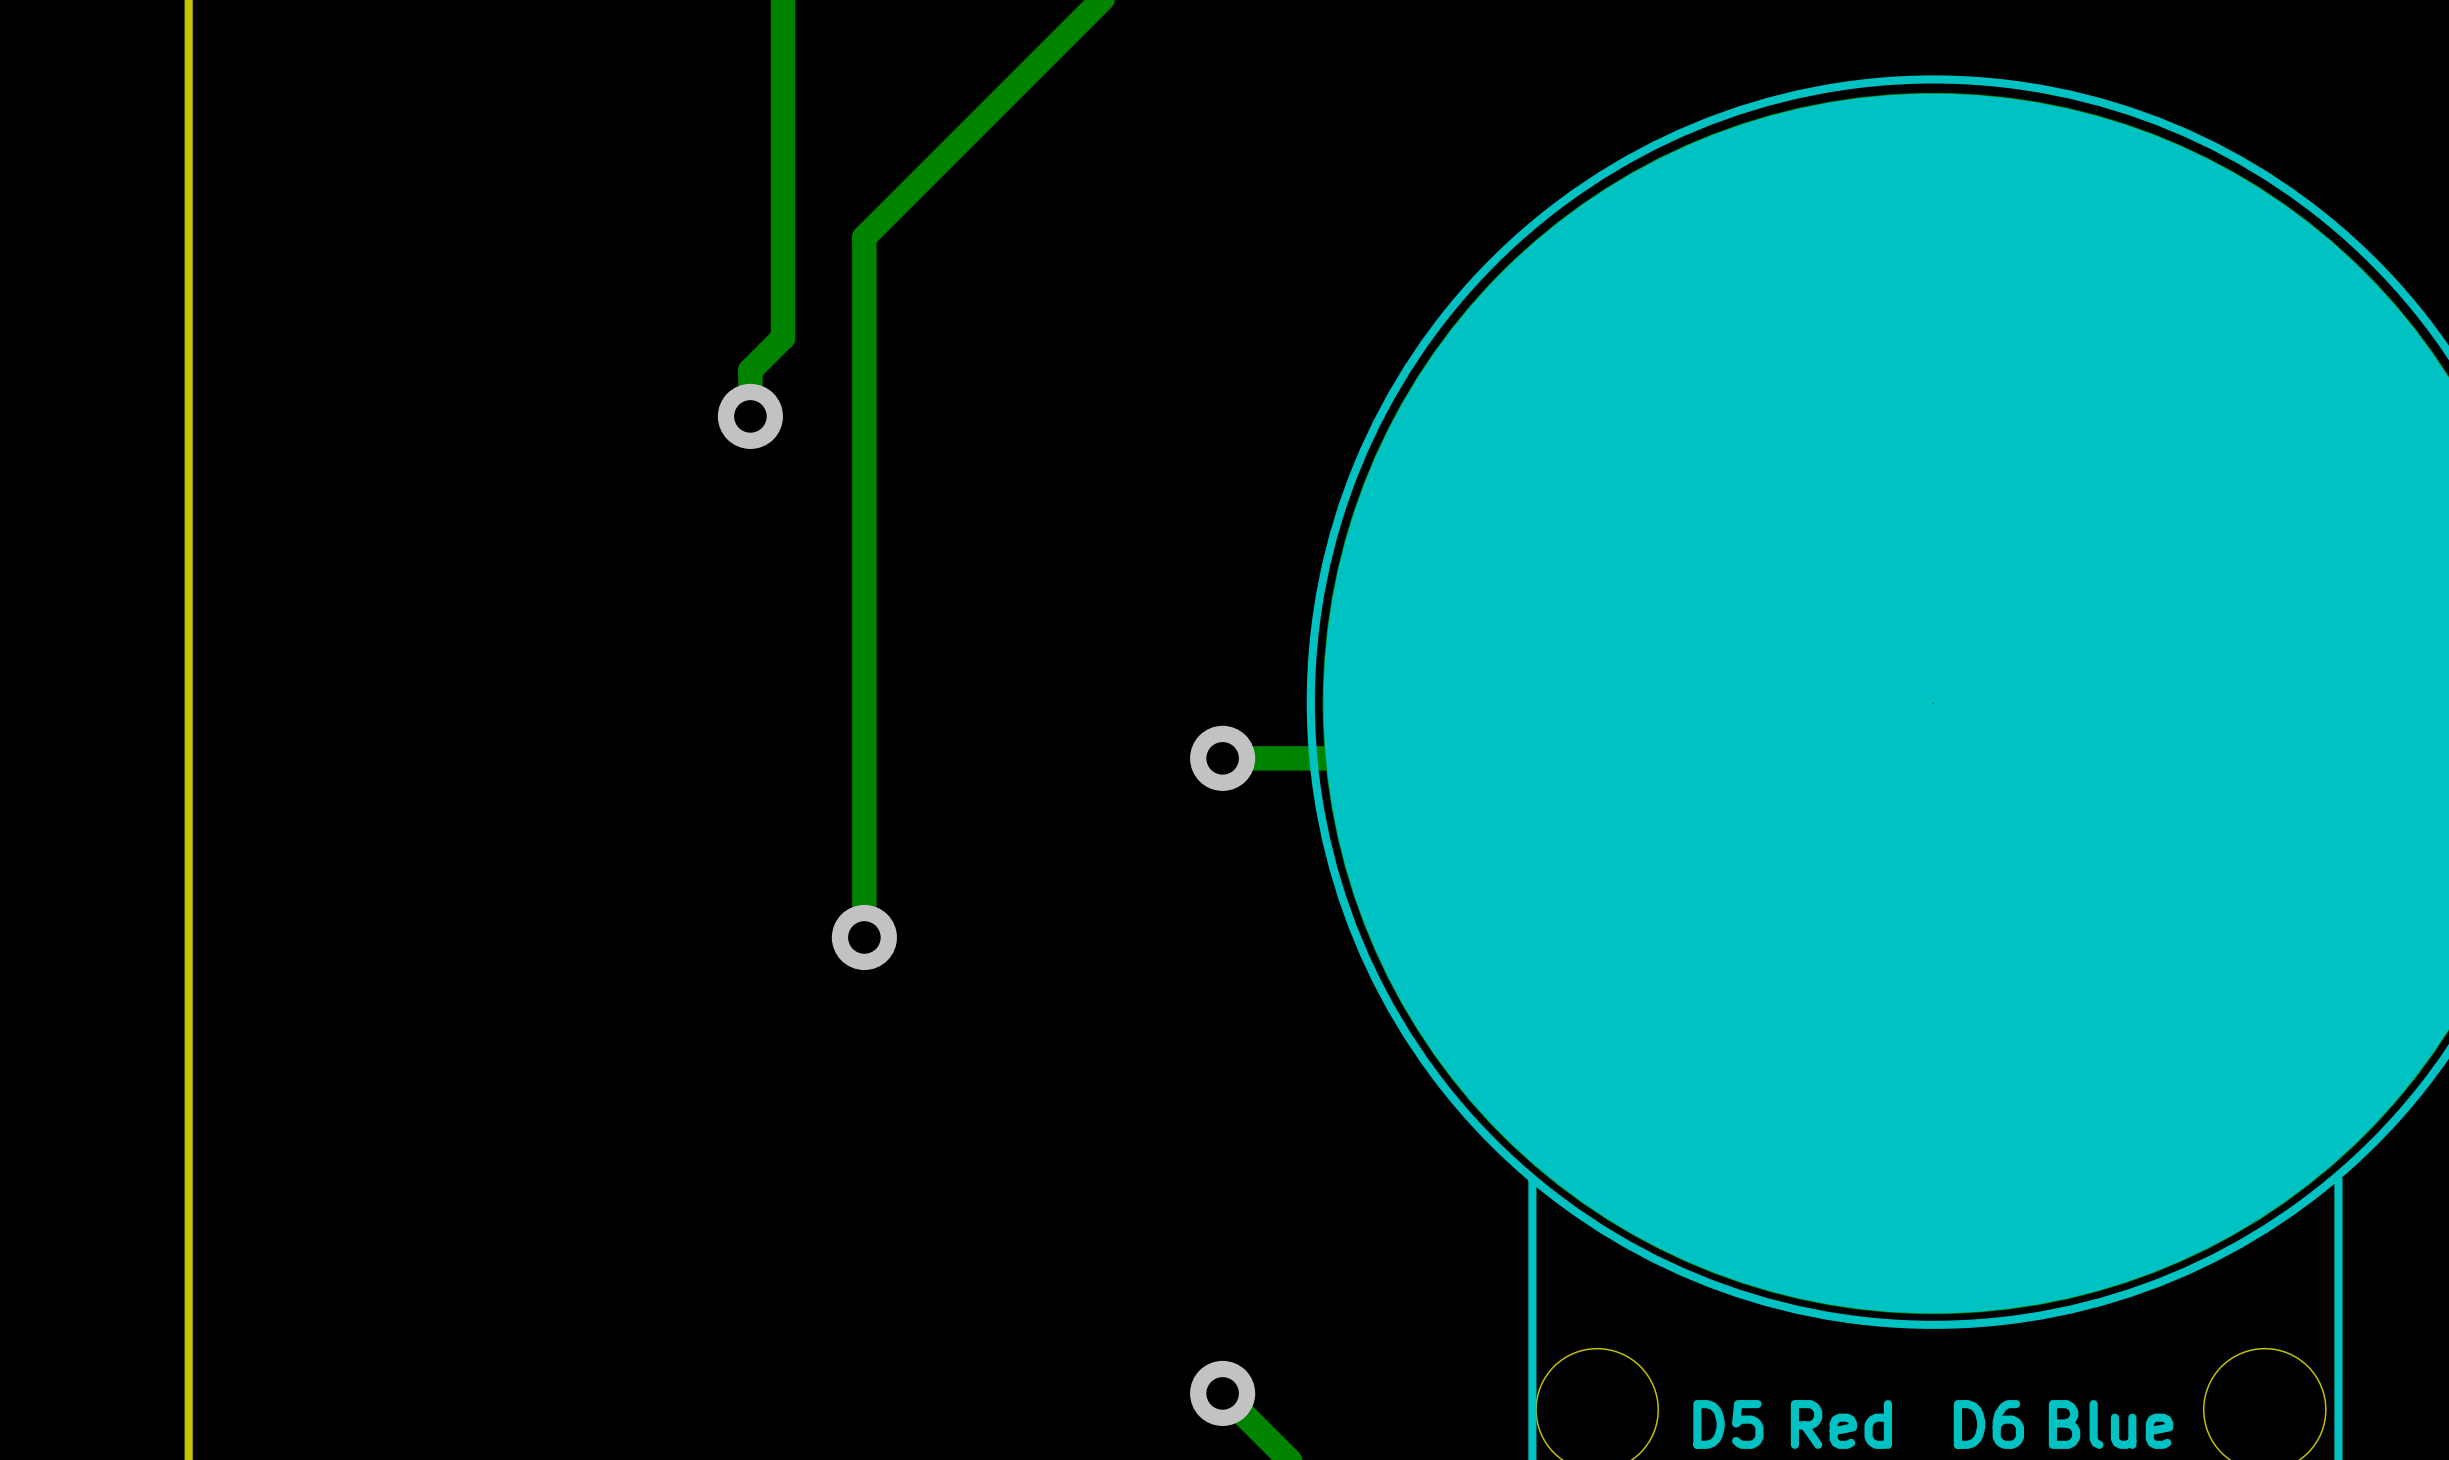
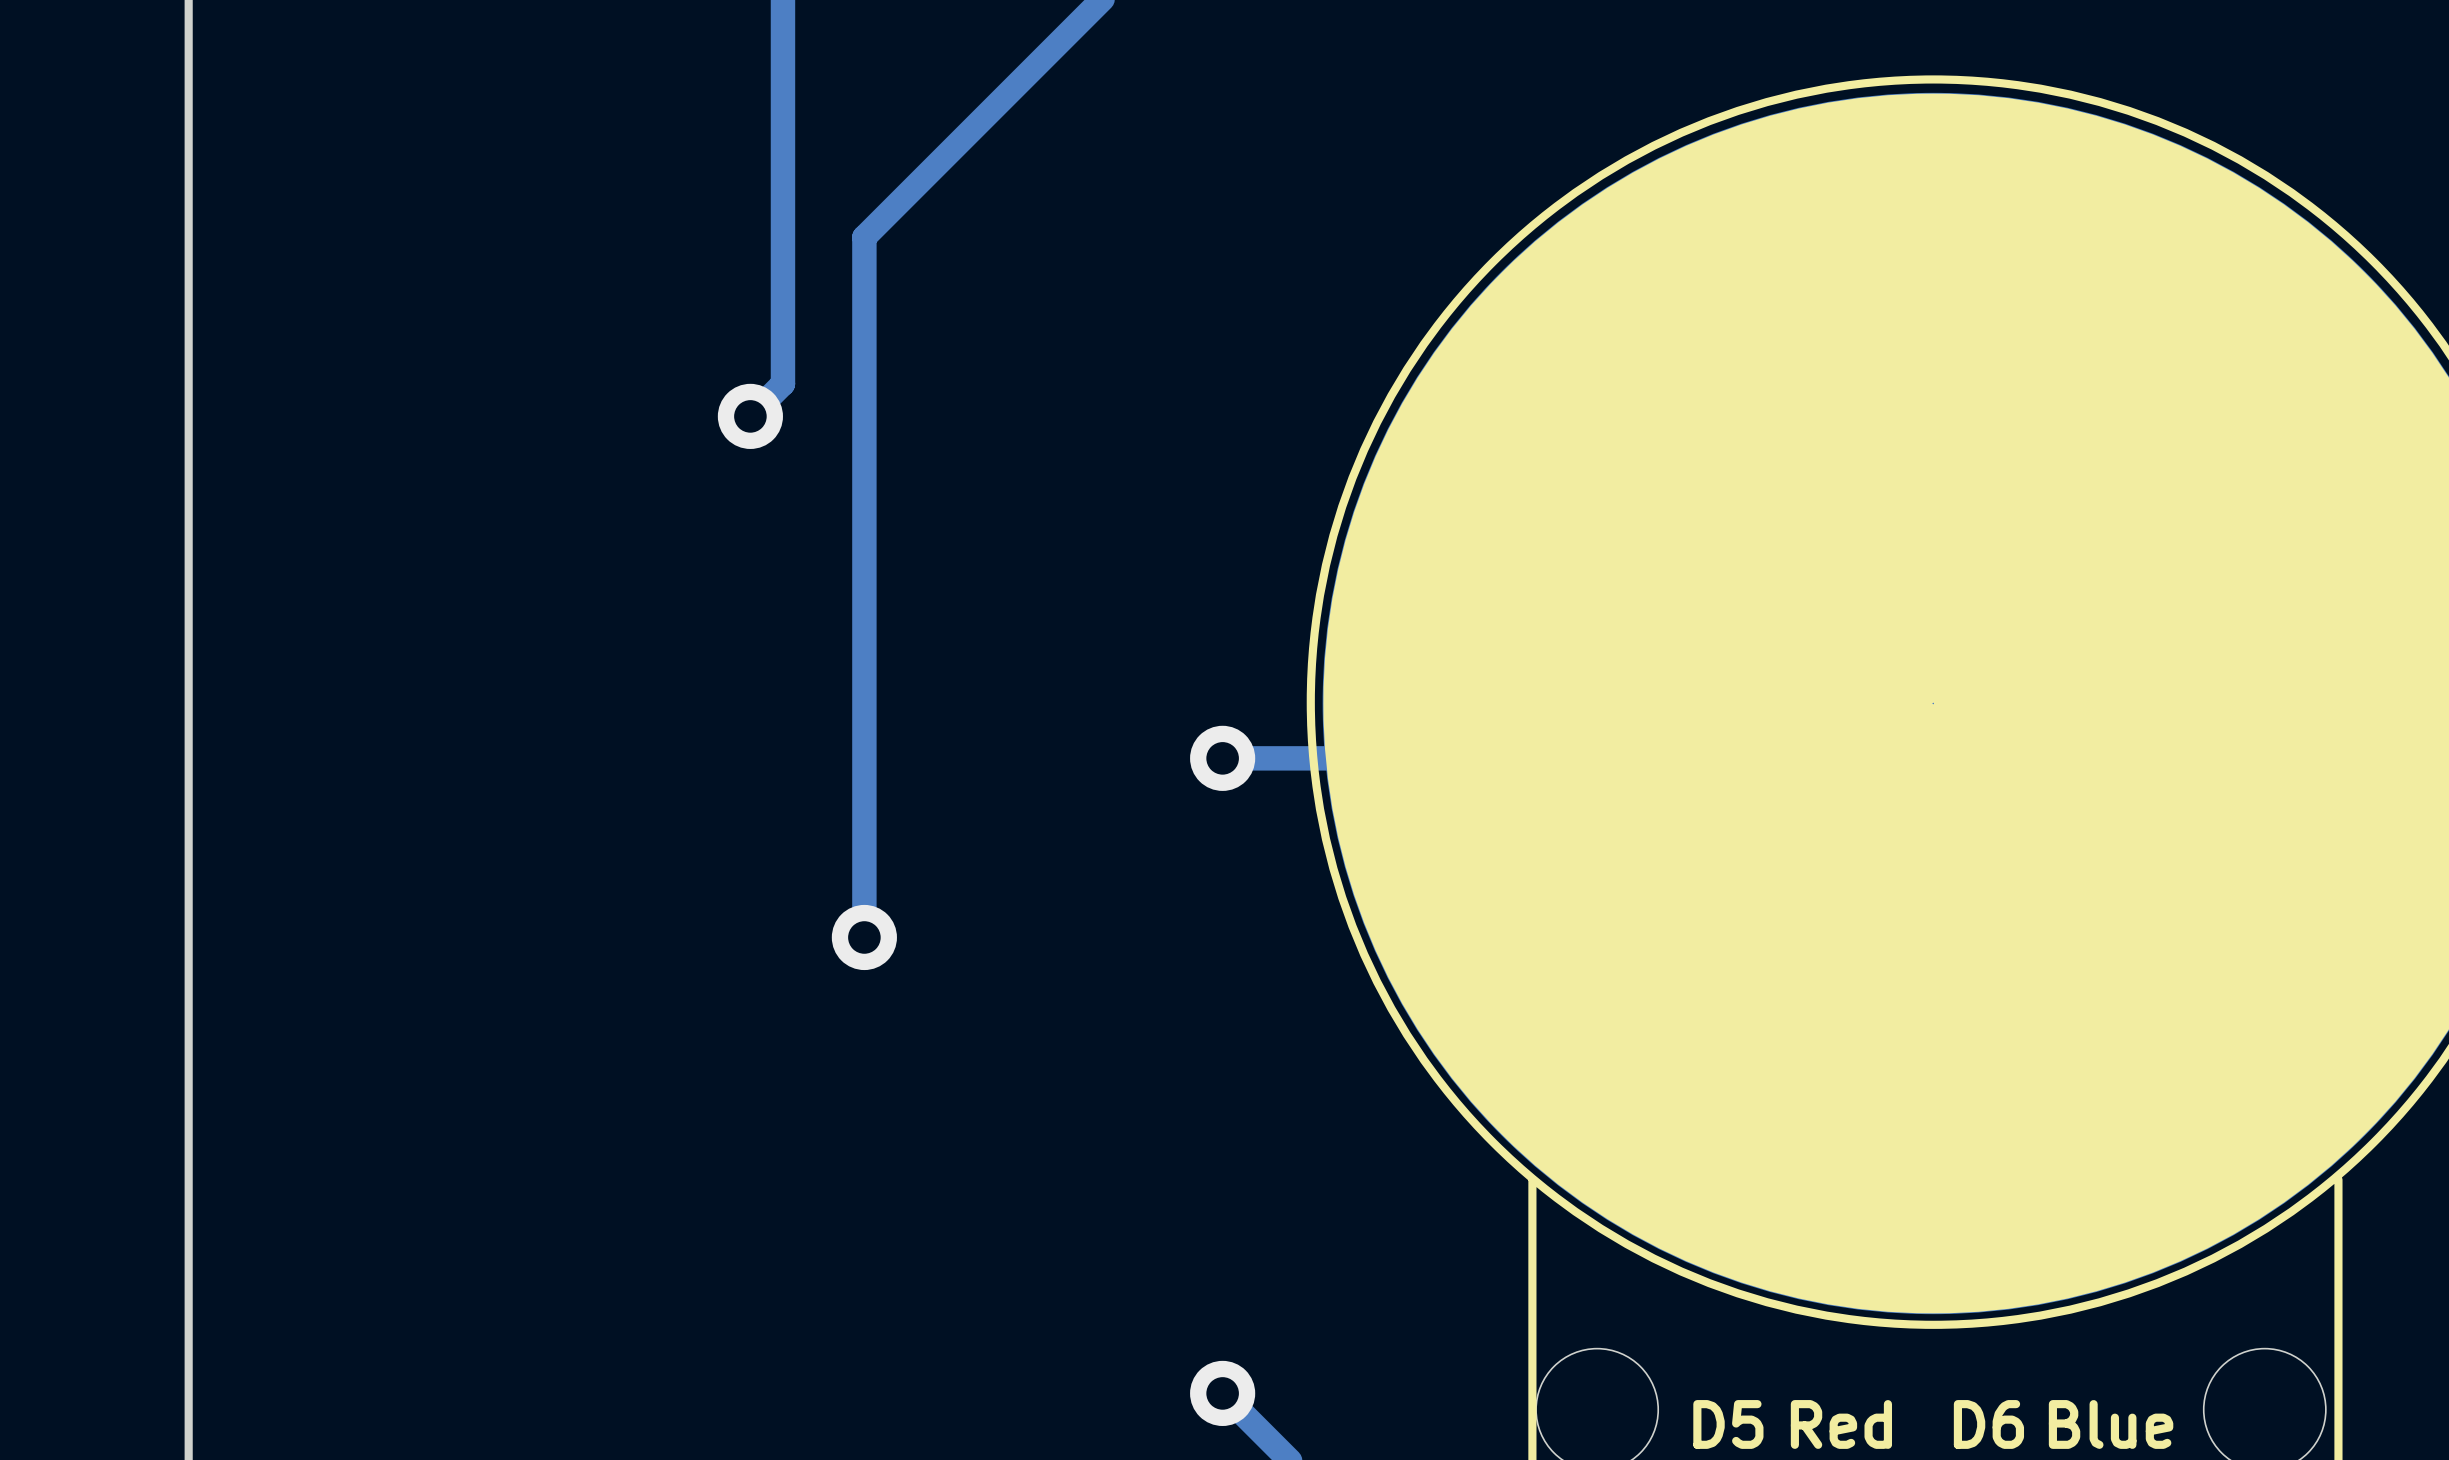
track: (782, 337) (750, 370) (750, 416) -> (782, 337) (782, 383) (750, 416)

